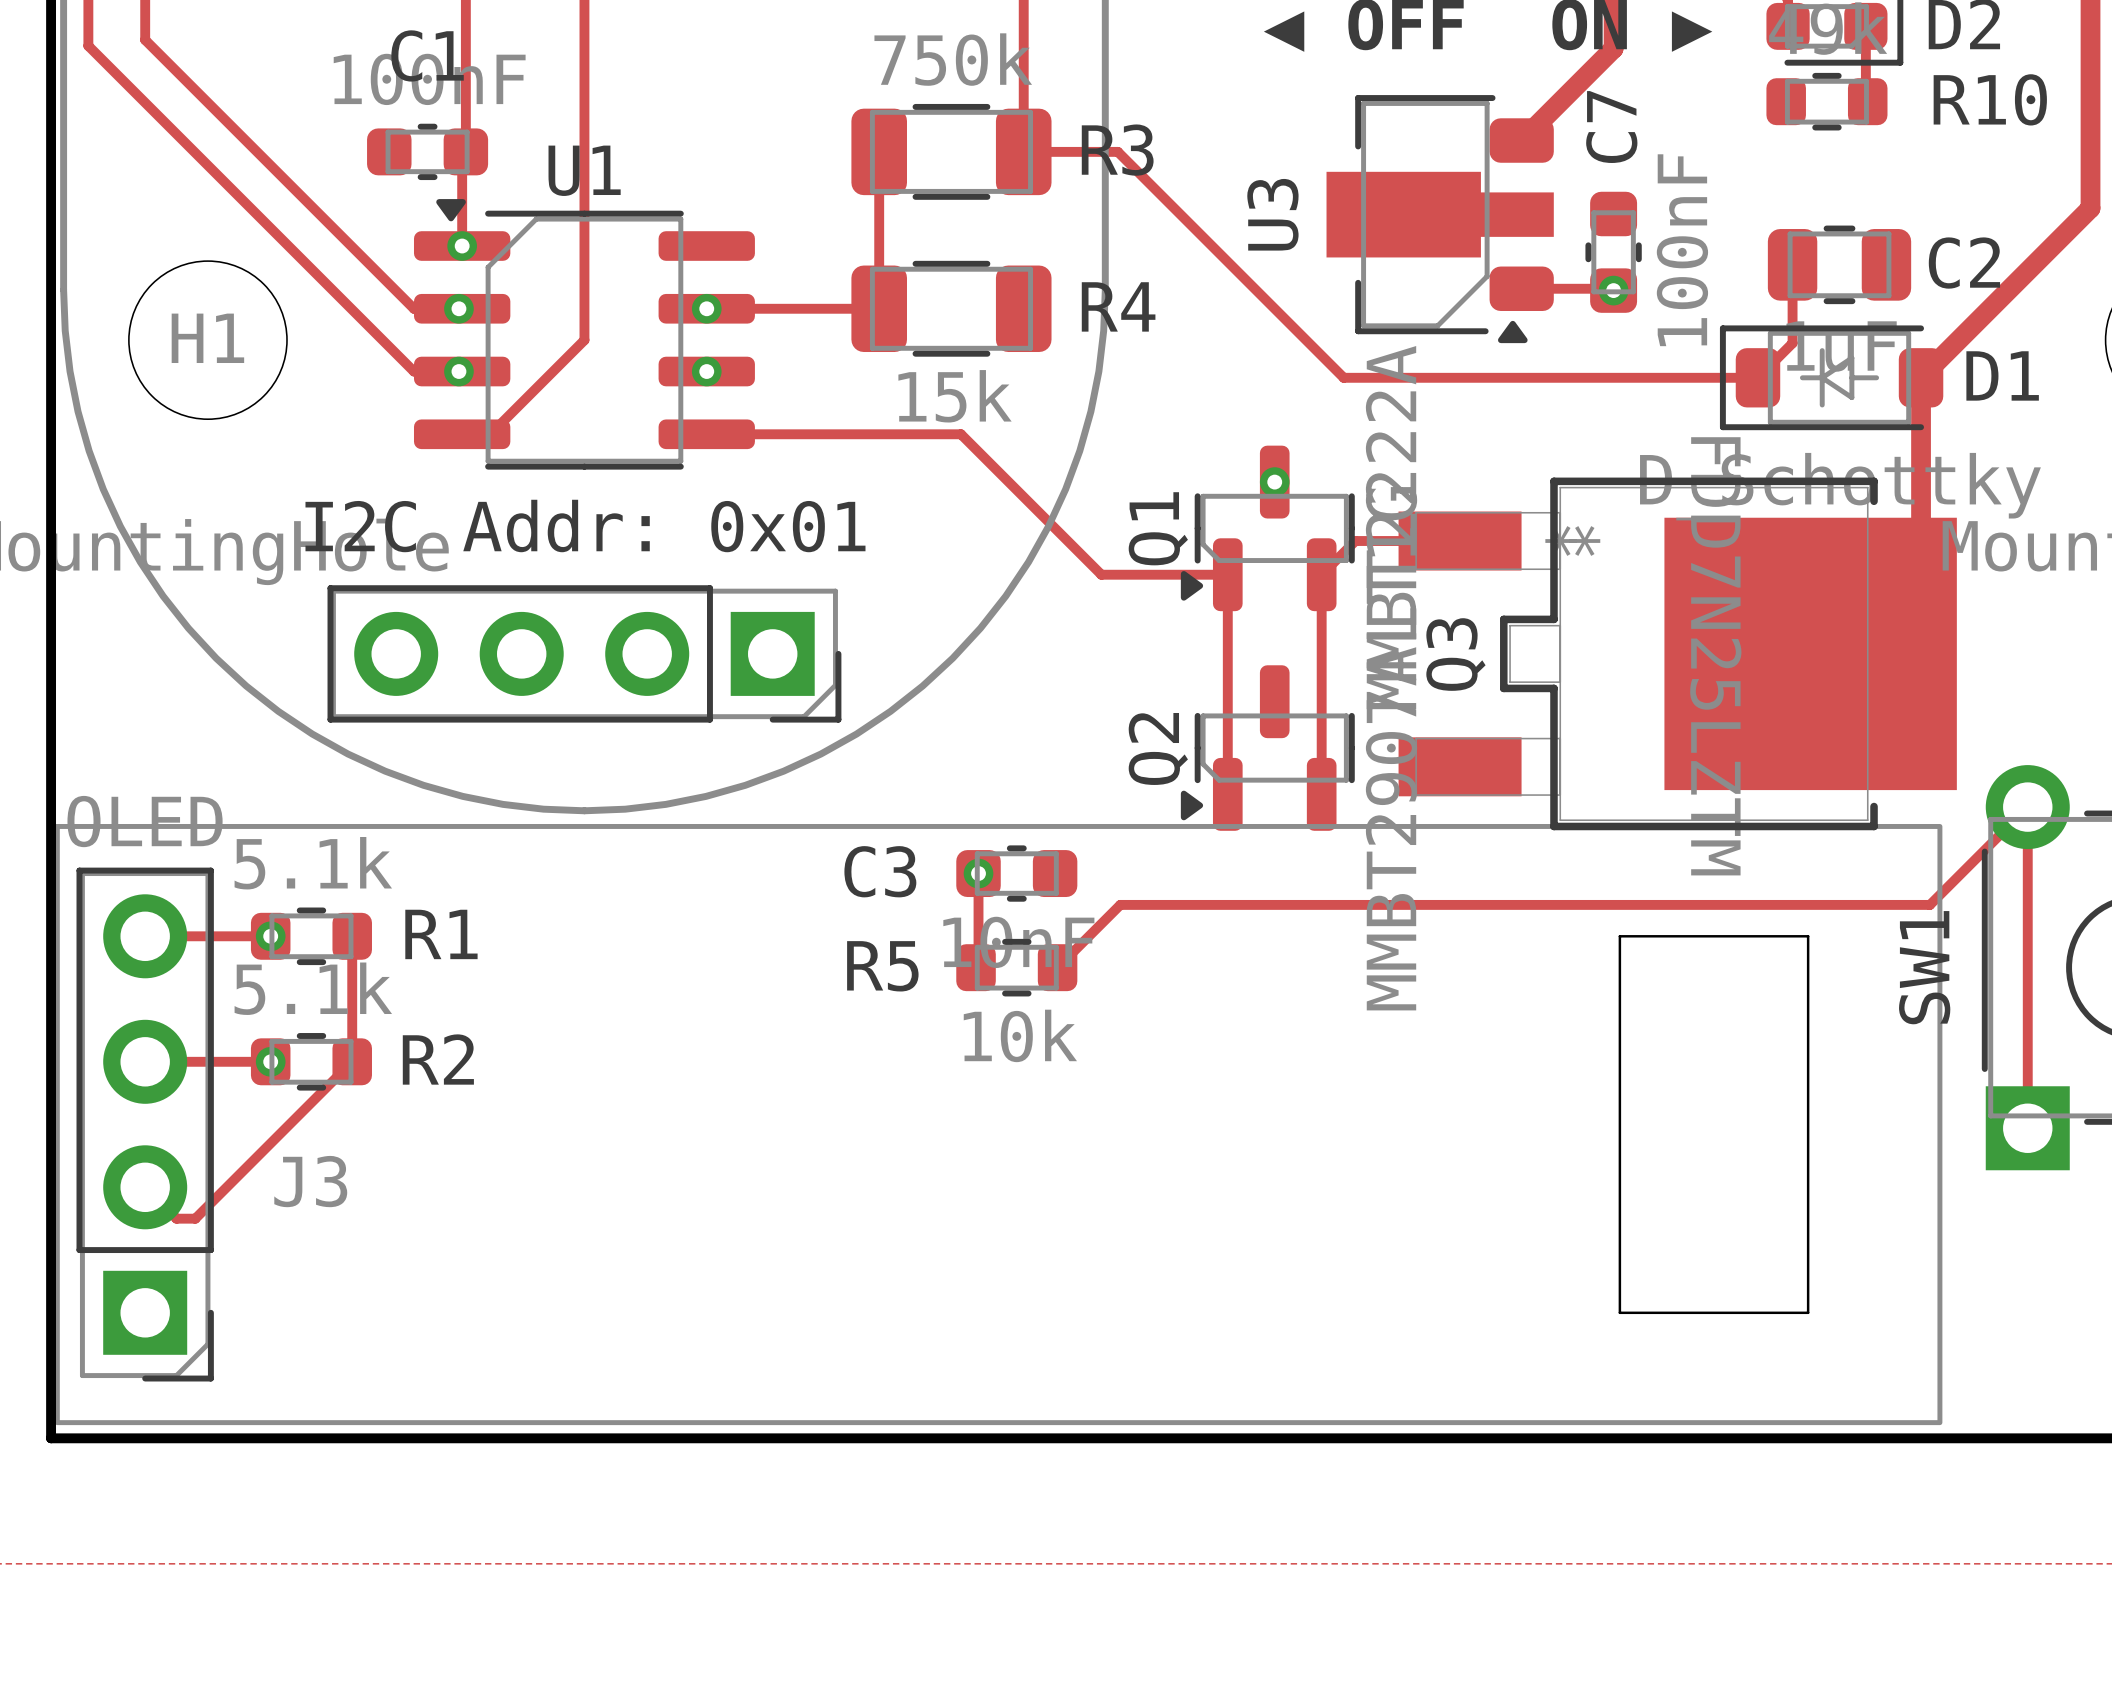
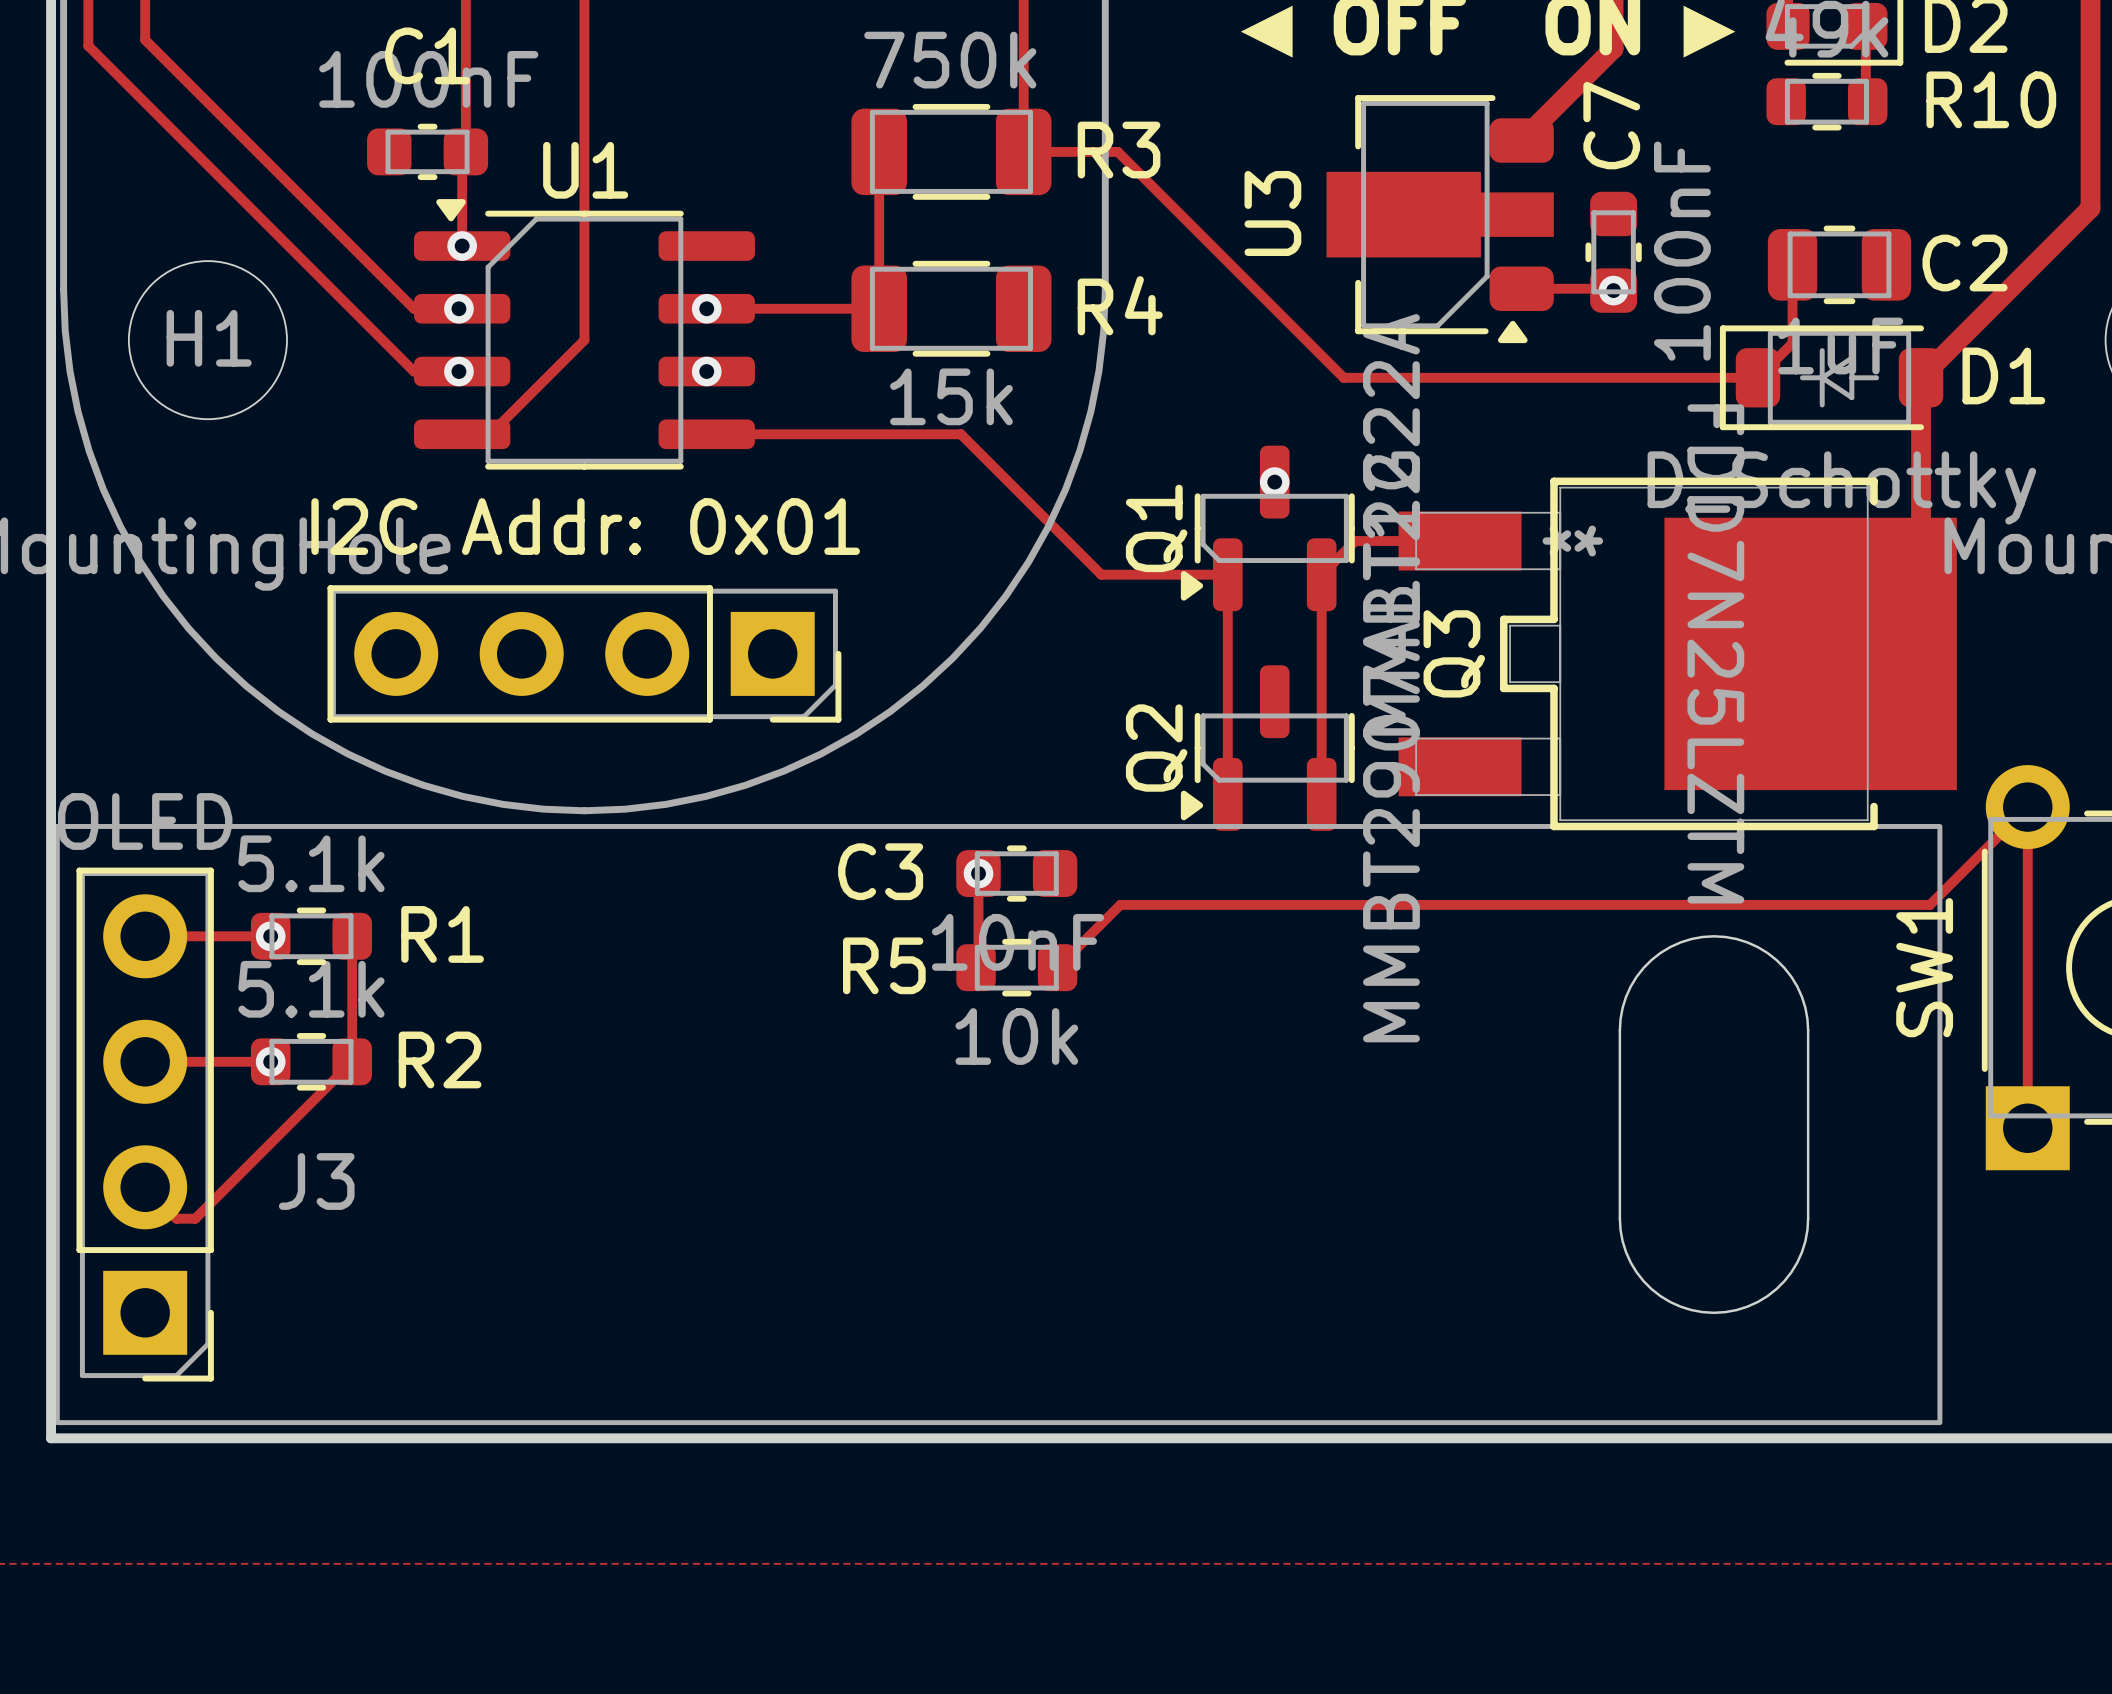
board edge: (1619, 1030) (1619, 936) (1808, 936) (1808, 1030) -> (1619, 1030) (1625, 997) (1636, 976) (1651, 959) (1680, 942) (1714, 936) (1747, 942) (1776, 959) (1797, 986) (1805, 1007) (1808, 1030)
board edge: (1619, 1218) (1619, 1312) (1808, 1312) (1808, 1218) -> (1619, 1218) (1622, 1241) (1630, 1262) (1651, 1289) (1680, 1306) (1714, 1312) (1747, 1306) (1776, 1289) (1791, 1272) (1802, 1252) (1808, 1218)

